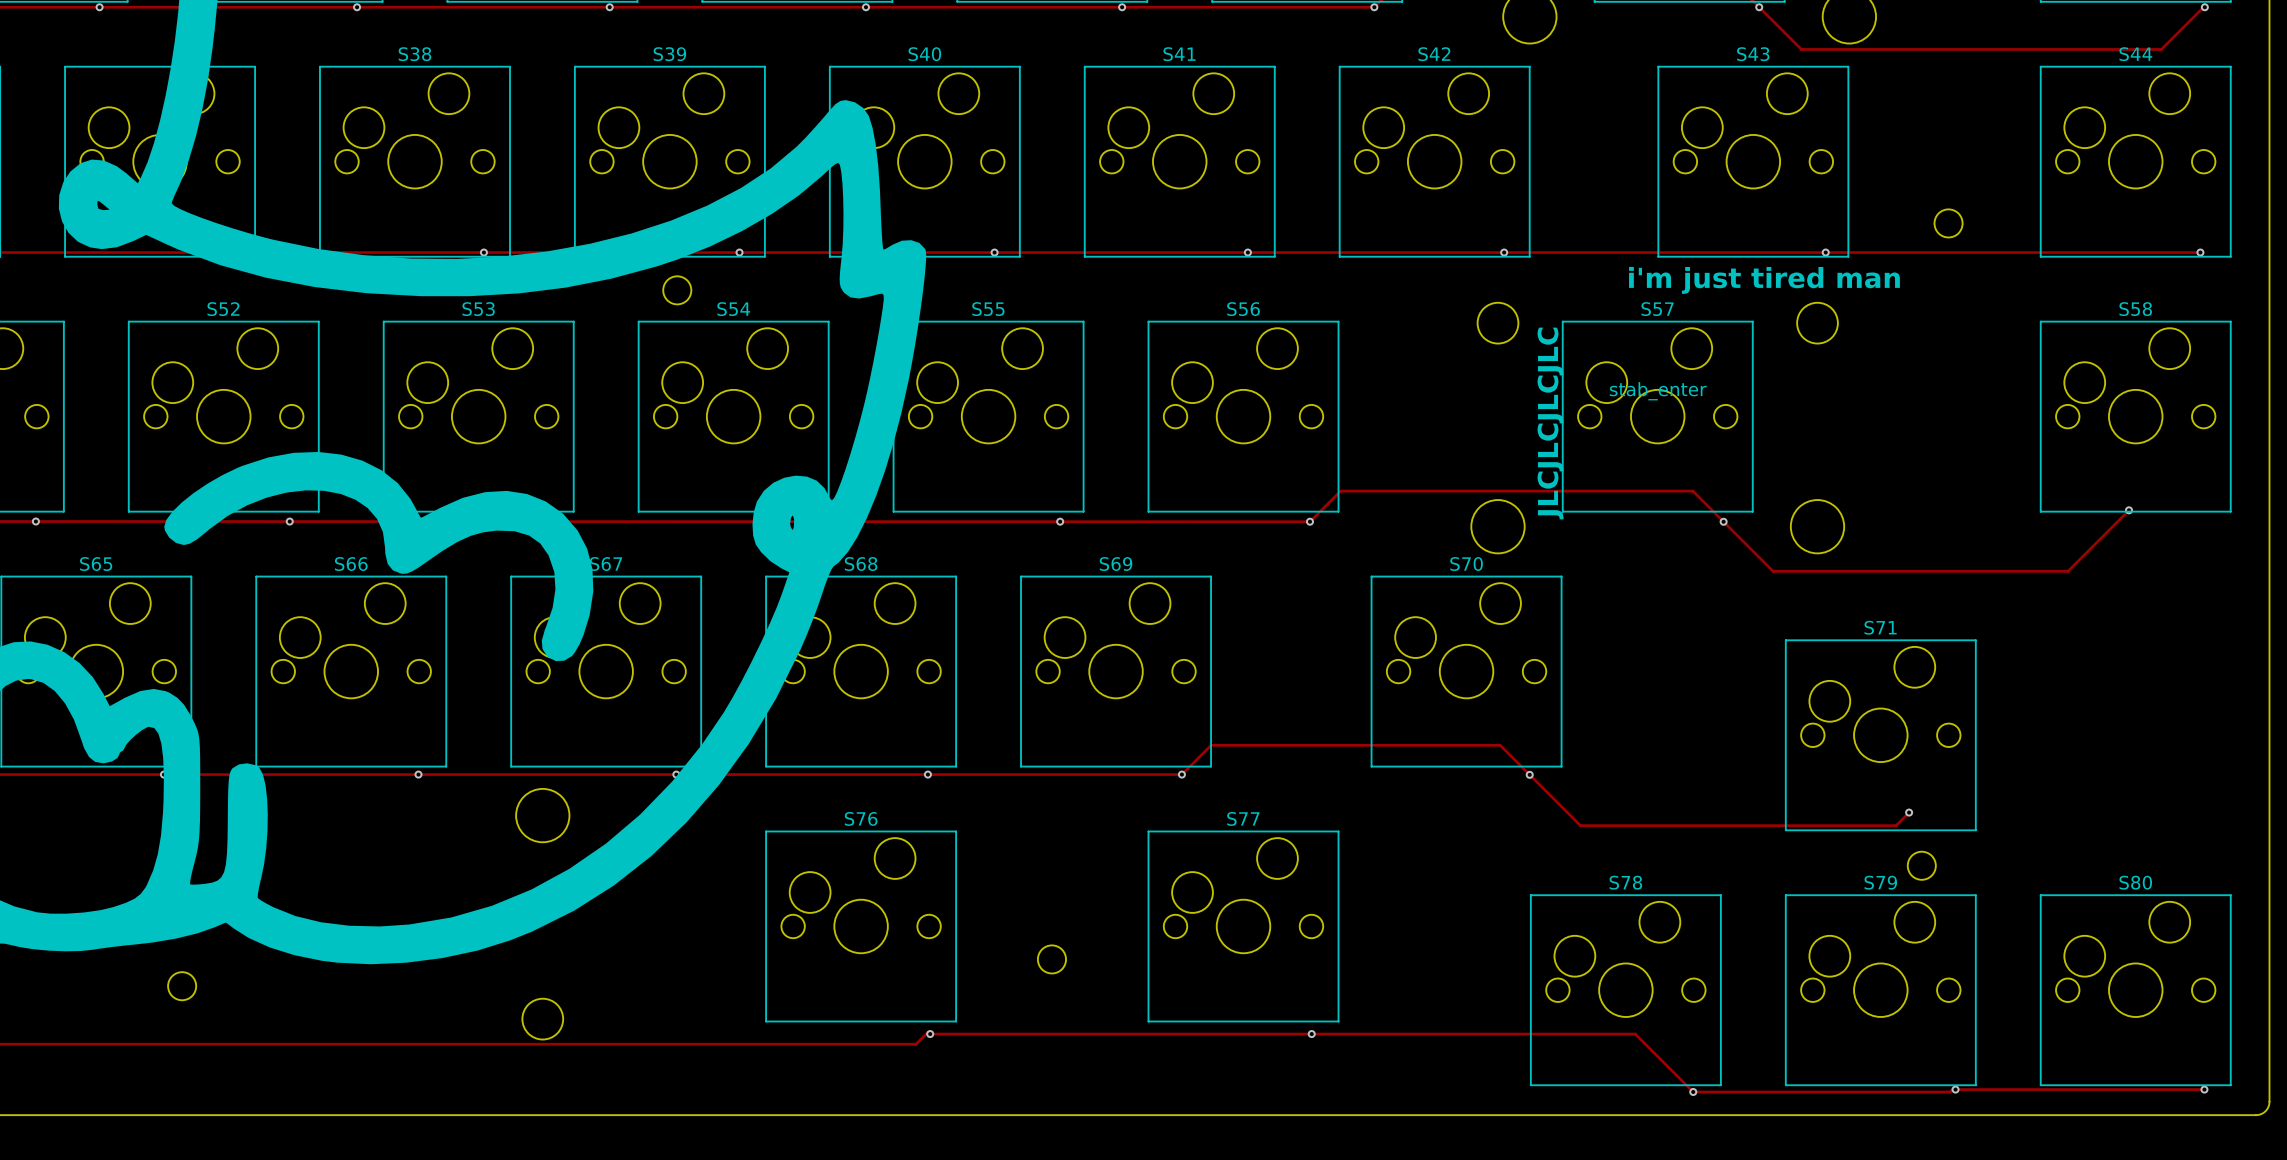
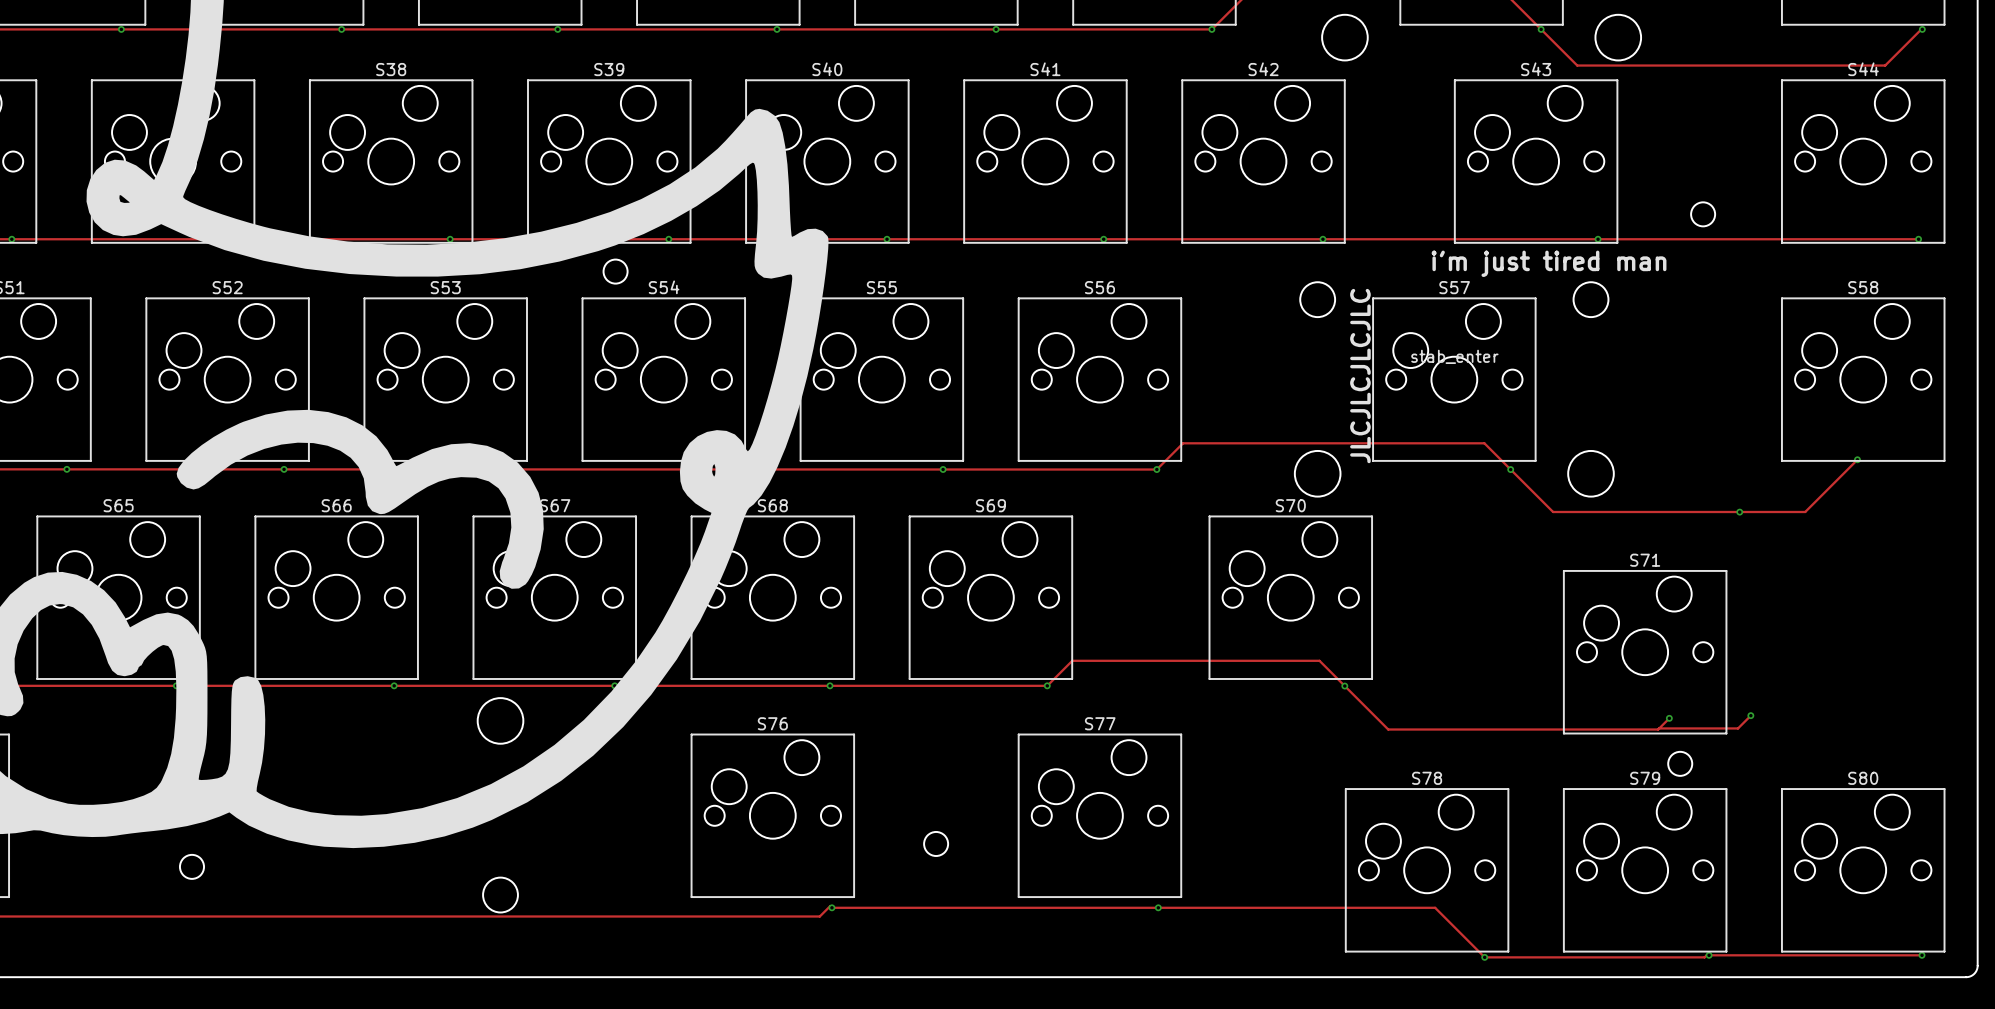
via: none -> (1739, 512)
track: none -> (1750, 715) (1738, 728) (1659, 728)
via: none -> (1750, 715)

